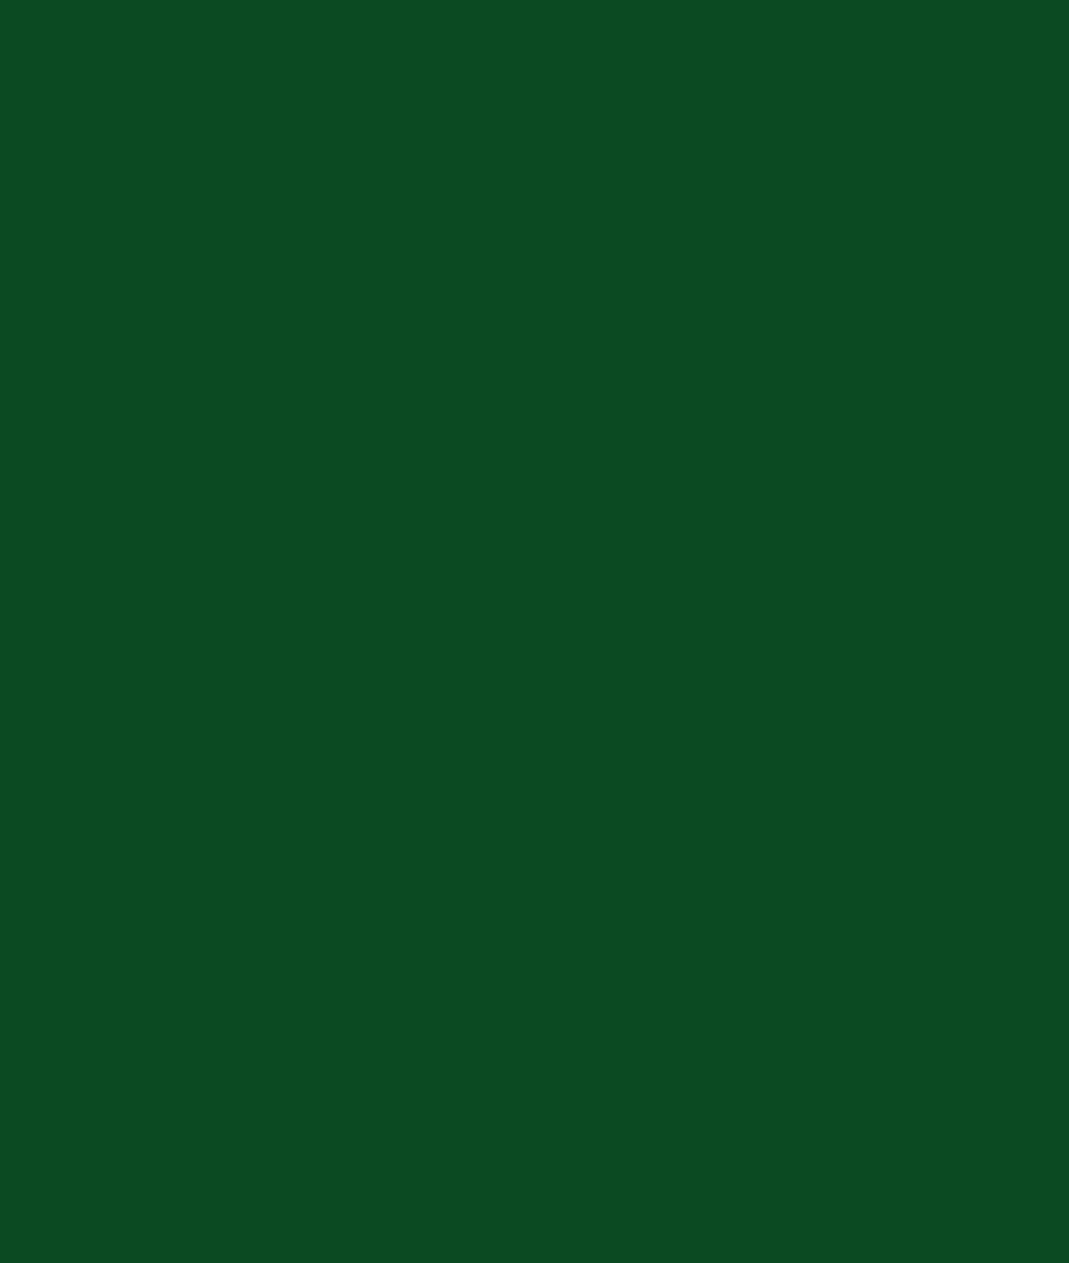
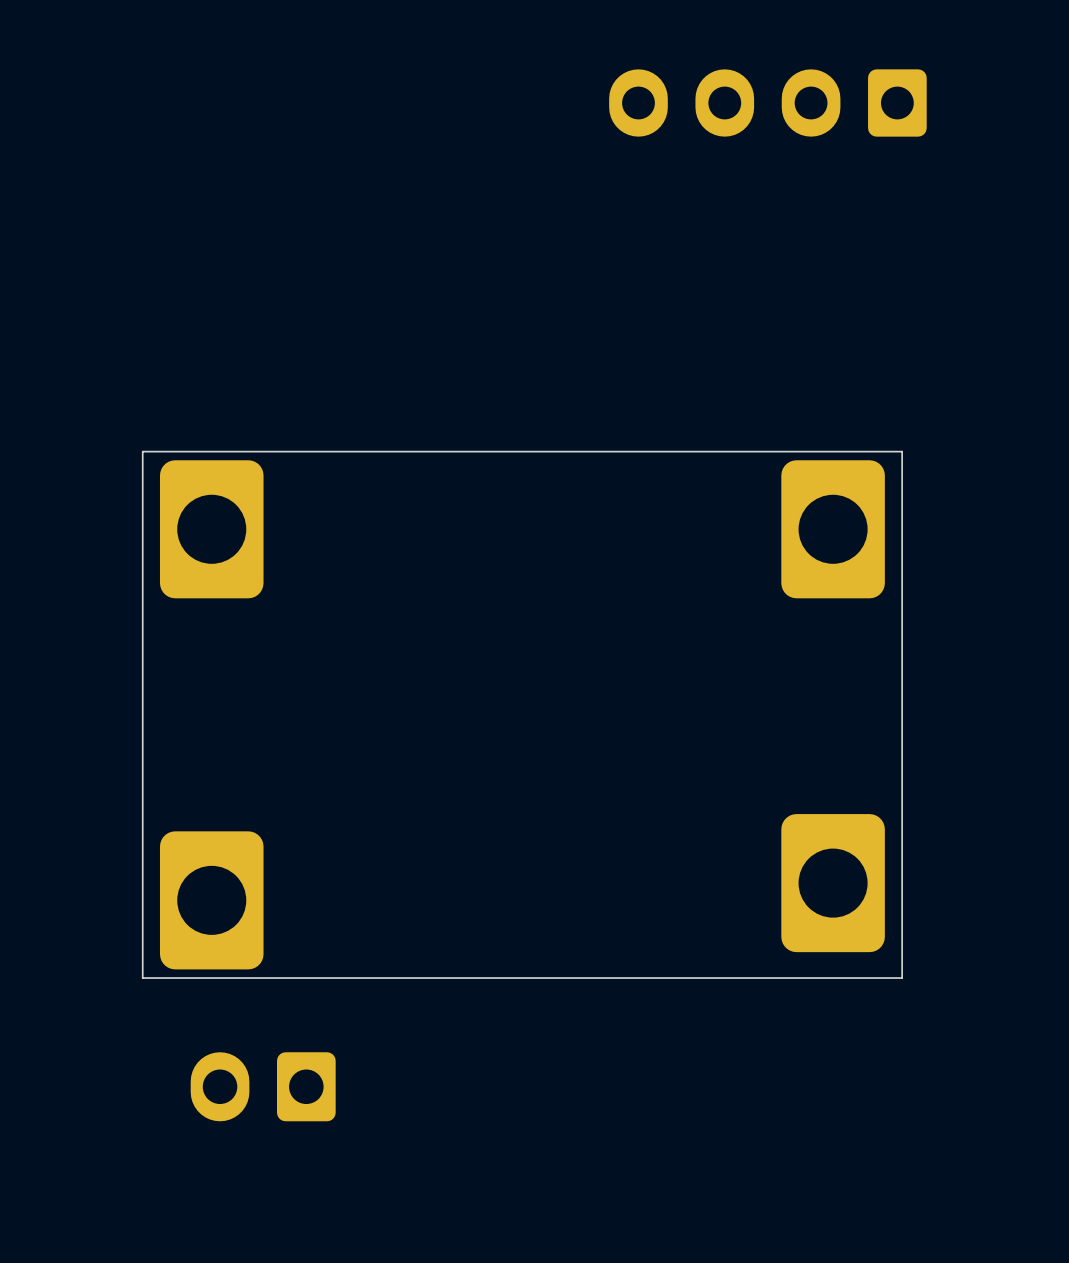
part: none -> (767, 102)
part: none -> (522, 714)
part: none -> (263, 1086)

